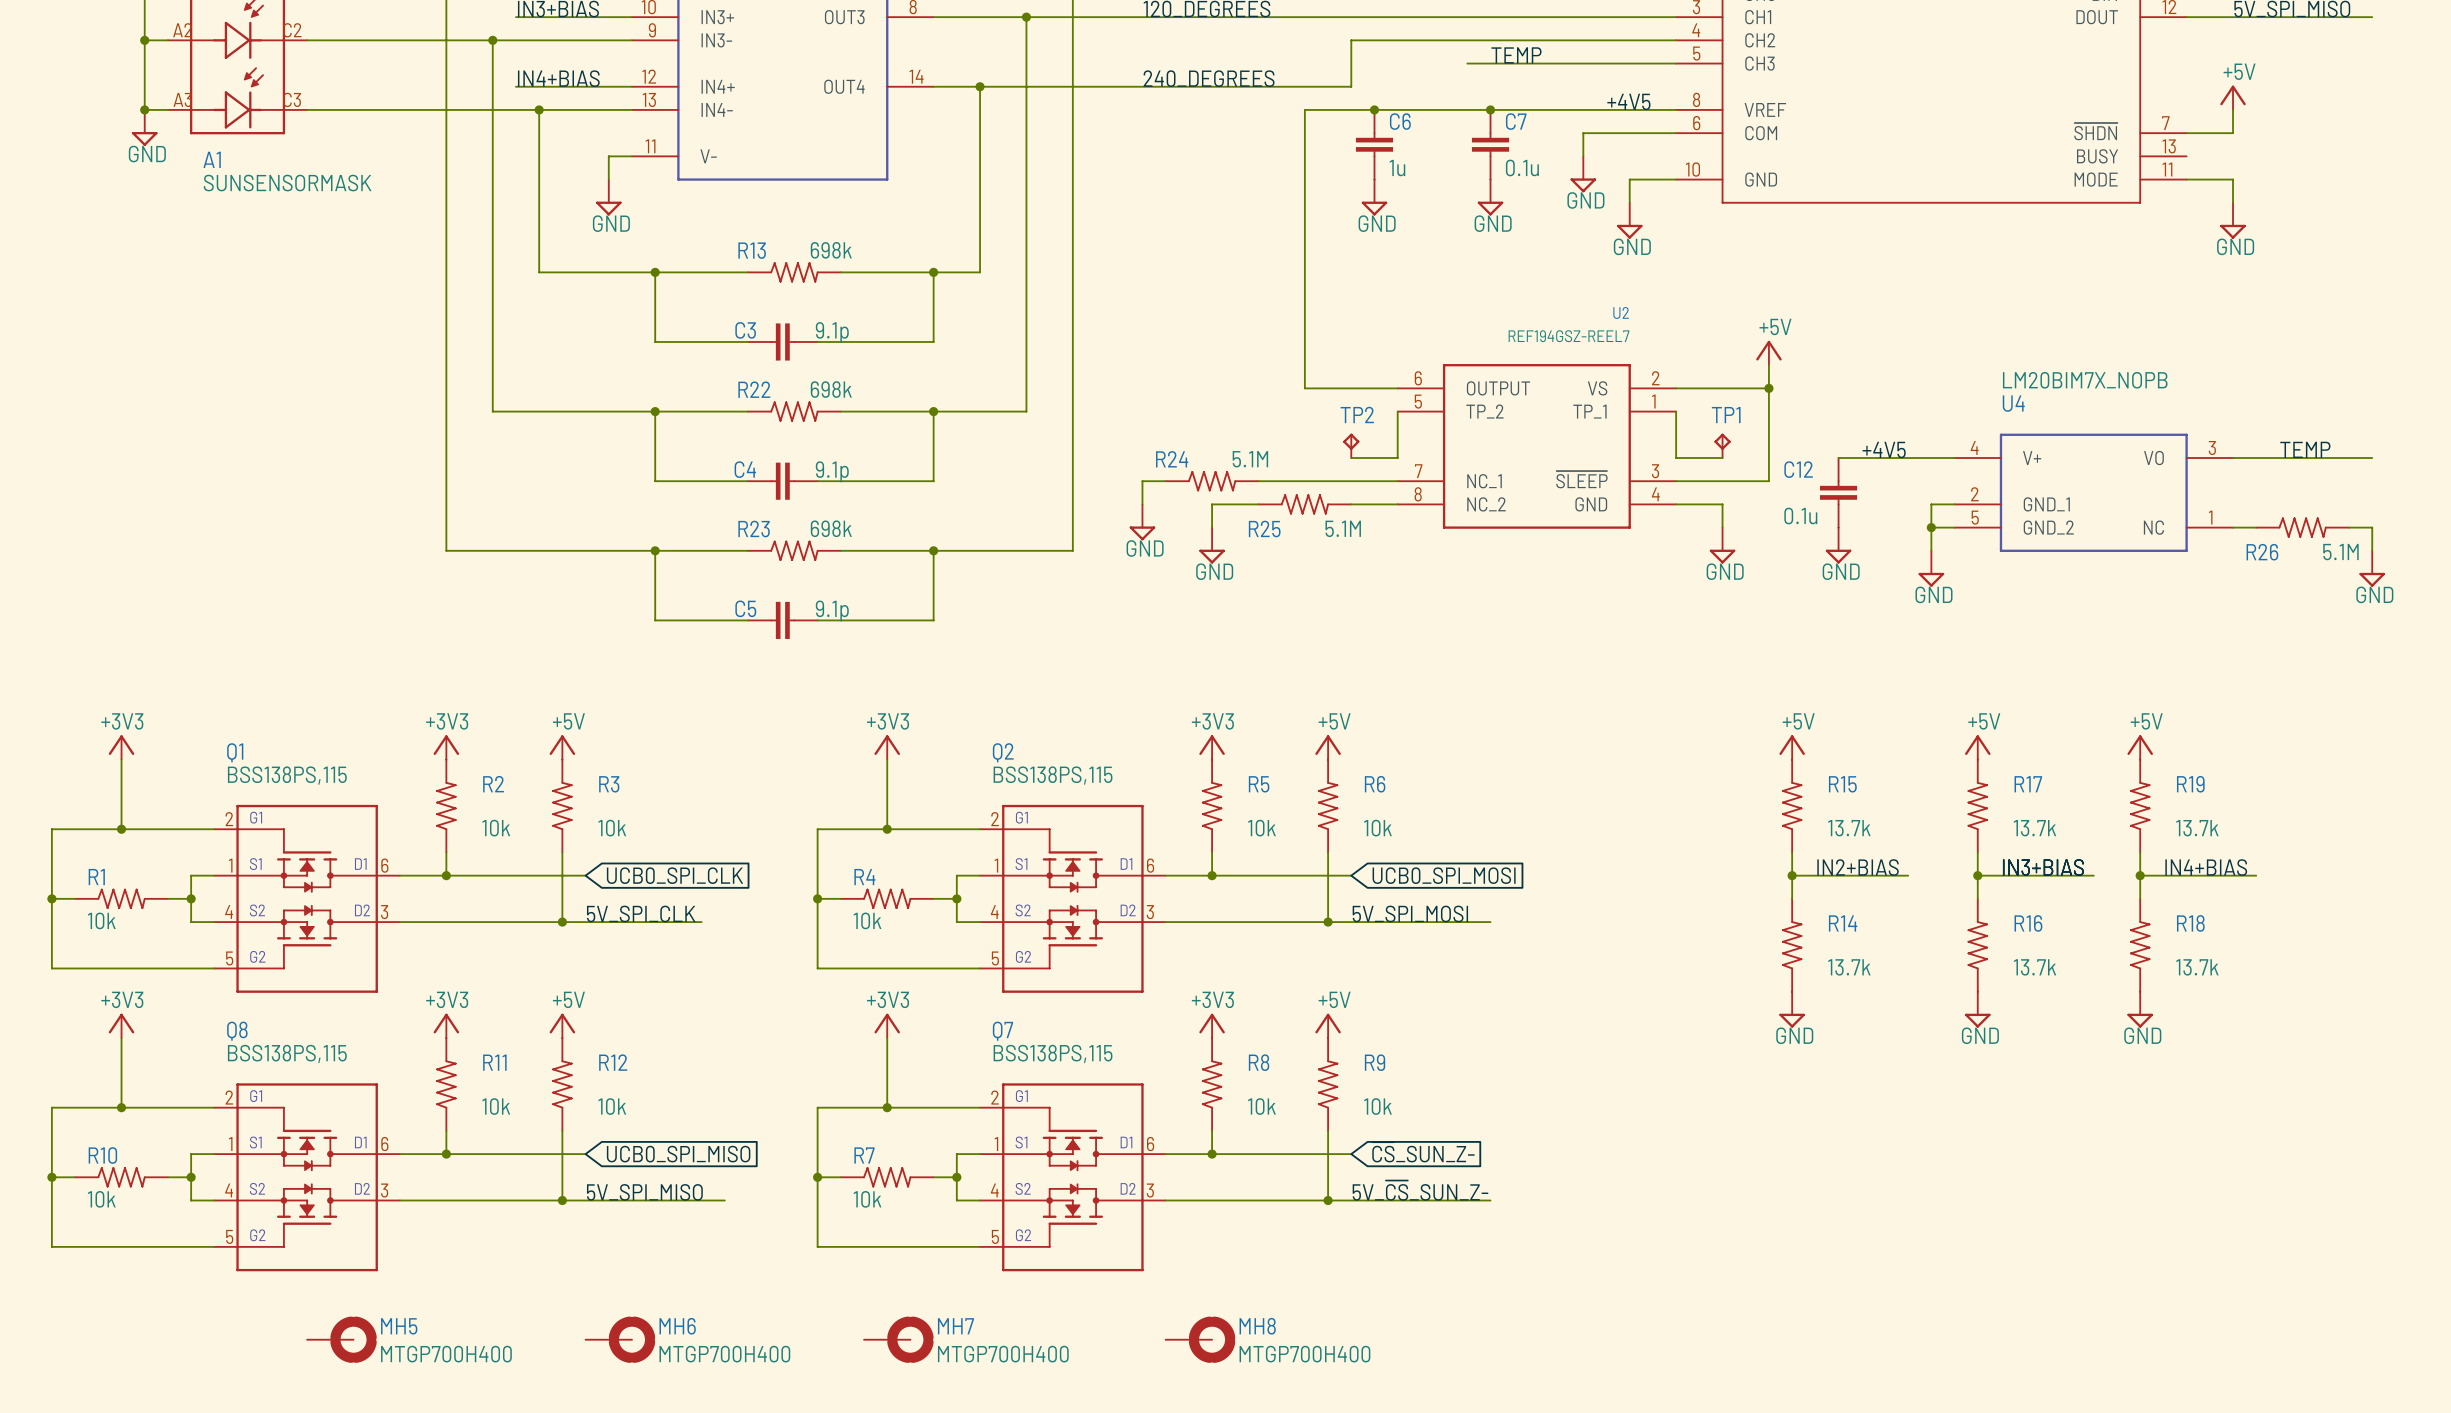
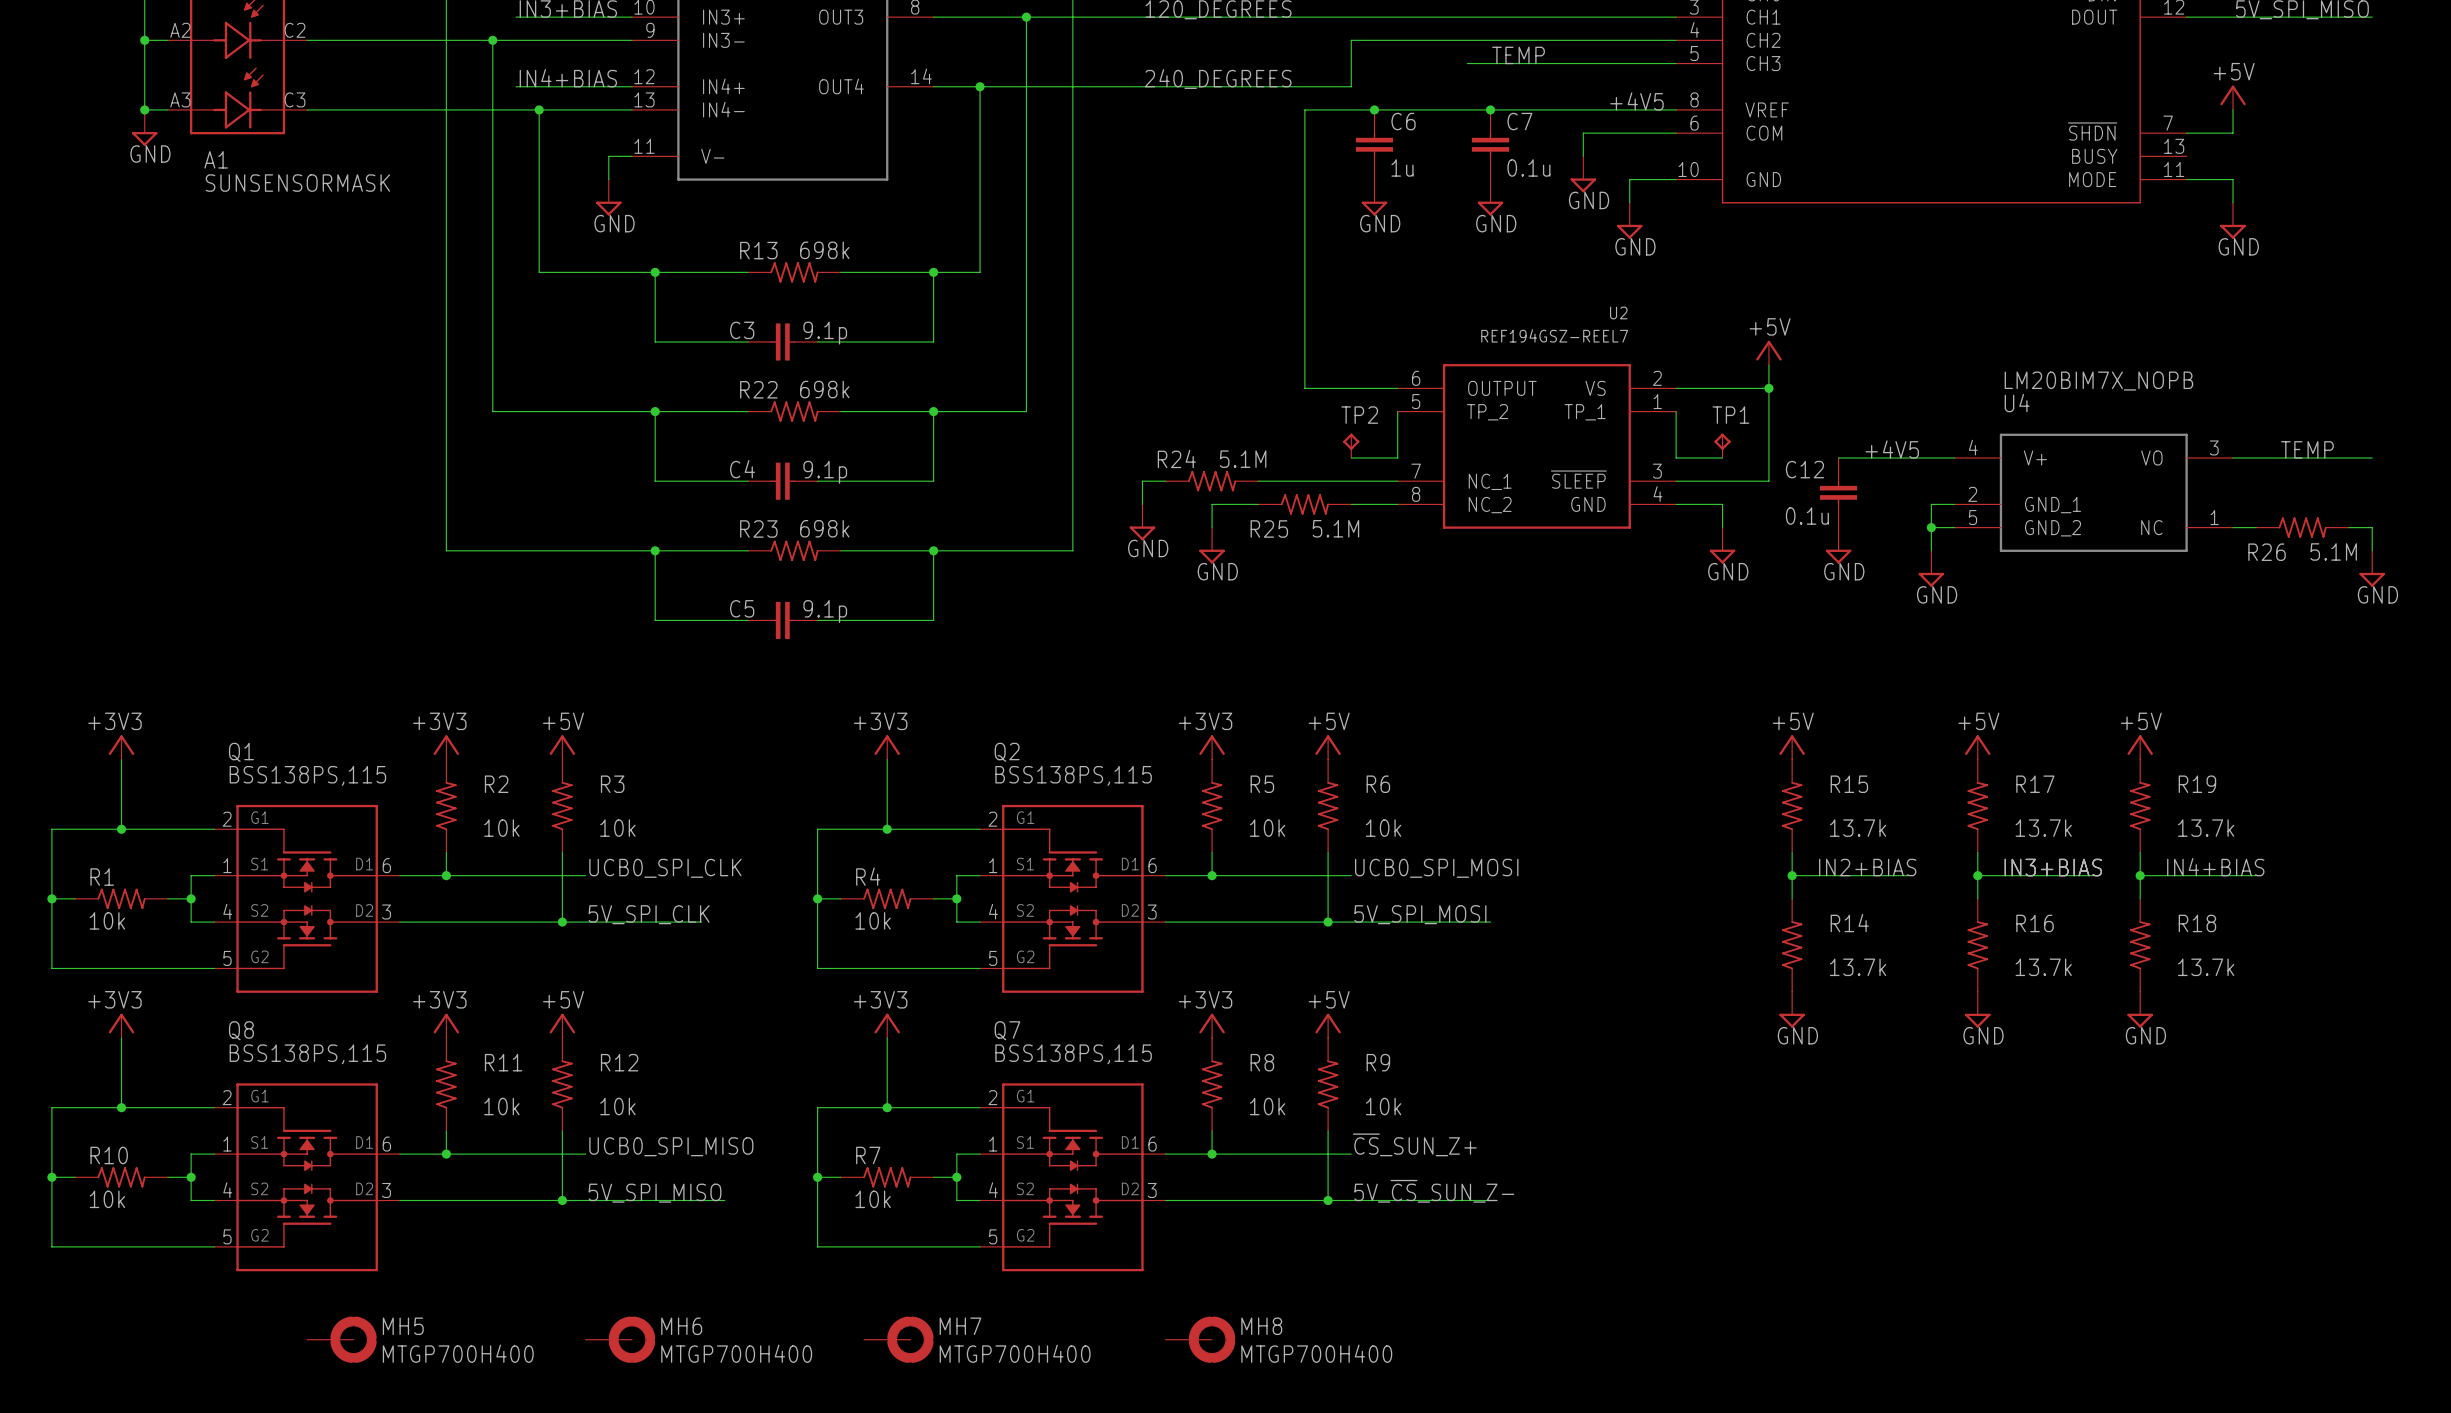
label: none -> UCB0_SPI_CLK (665, 868)
label: none -> UCB0_SPI_MOSI (1436, 868)
global label: UCB0_SPI_CLK (674, 875) -> none
global label: UCB0_SPI_MOSI (1444, 875) -> none
label: none -> ~{CS}_SUN_Z+ (1414, 1144)
label: none -> UCB0_SPI_MISO (671, 1146)
global label: ~{CS}_SUN_Z- (1423, 1152) -> none
global label: UCB0_SPI_MISO (678, 1154) -> none

